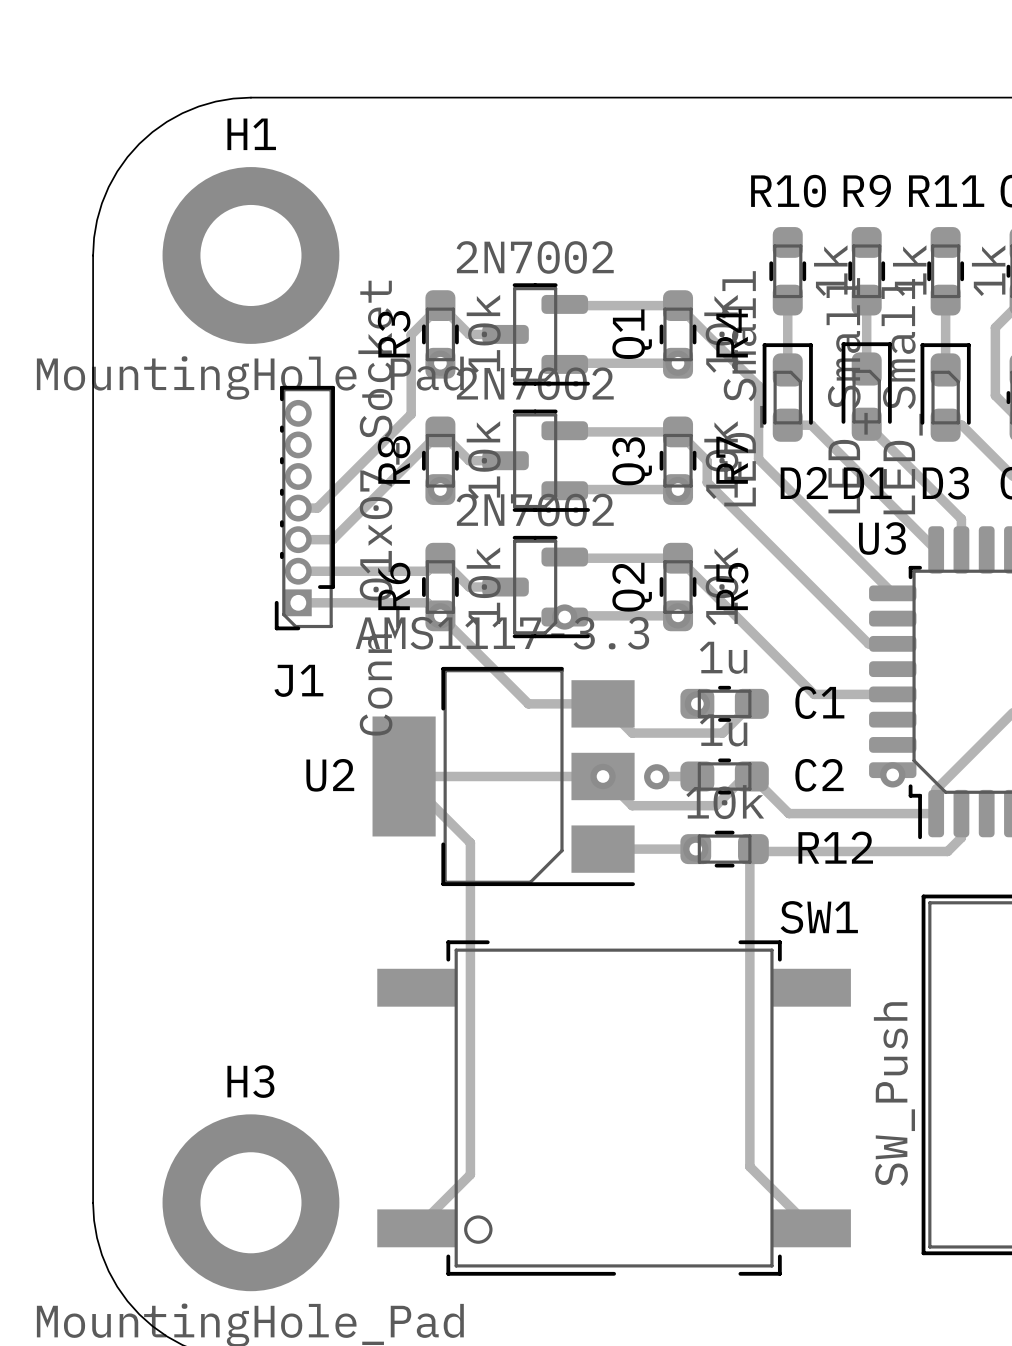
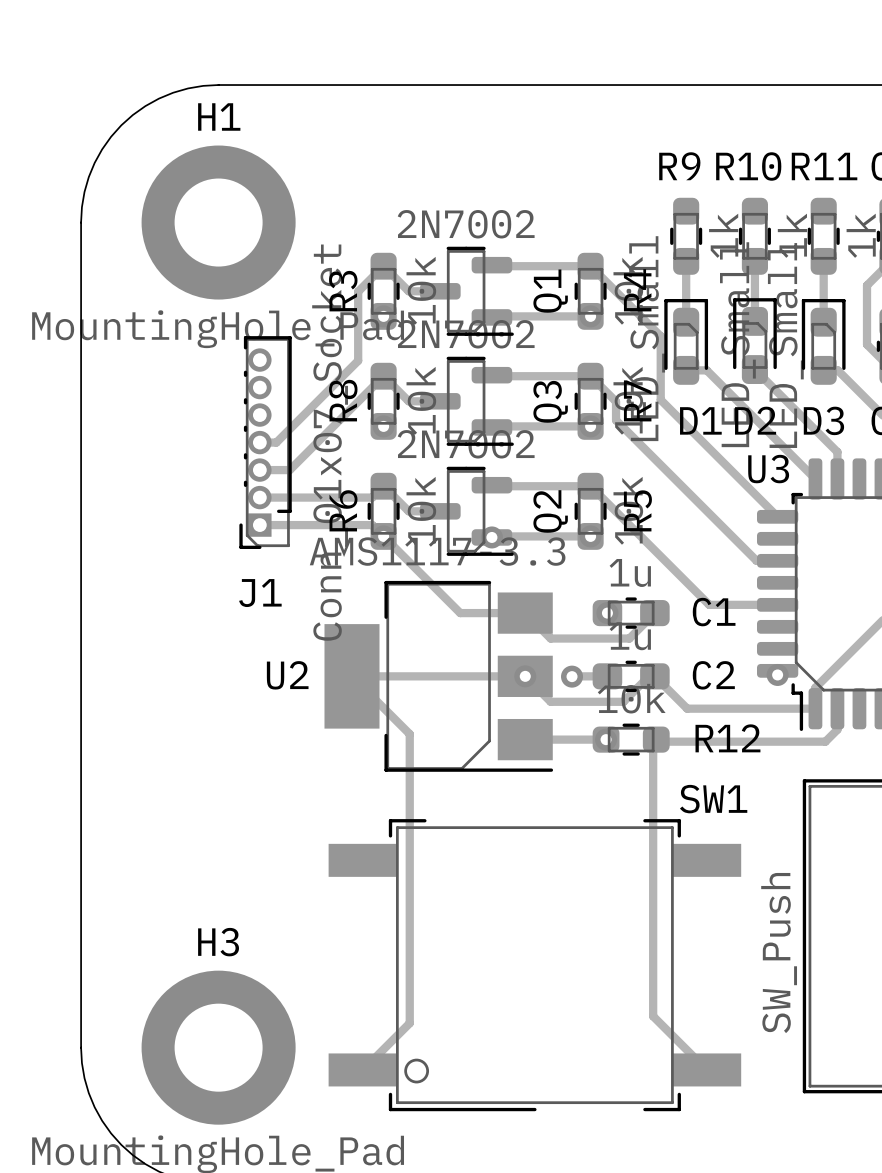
R9 name: R9 (867, 190) -> R10 (748, 166)
R10 name: R10 (788, 191) -> R9 (679, 166)
D2 name: D2 (804, 482) -> D1 (700, 420)
D1 name: D1 (867, 483) -> D2 (755, 420)

